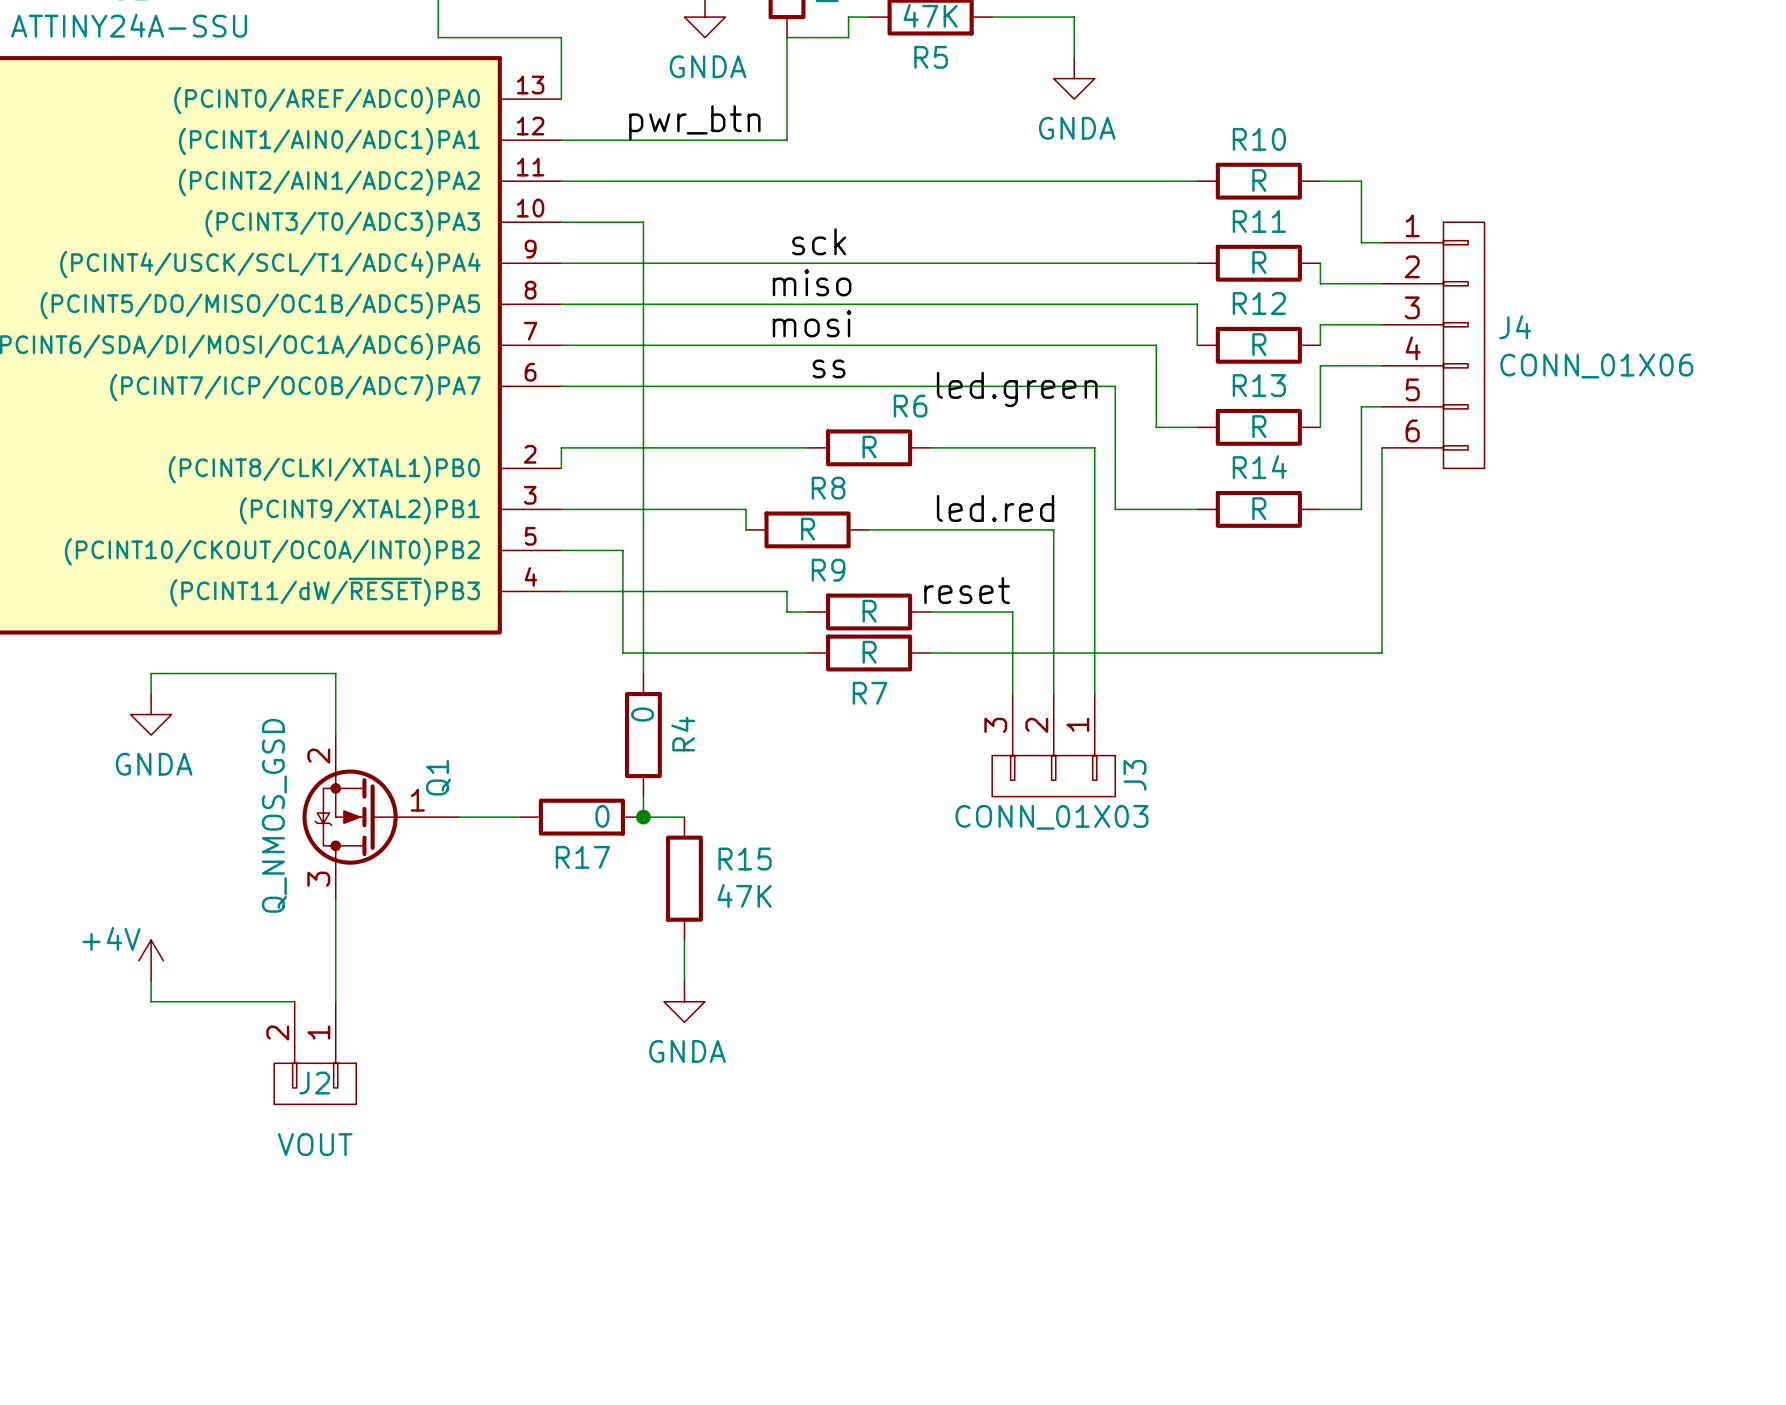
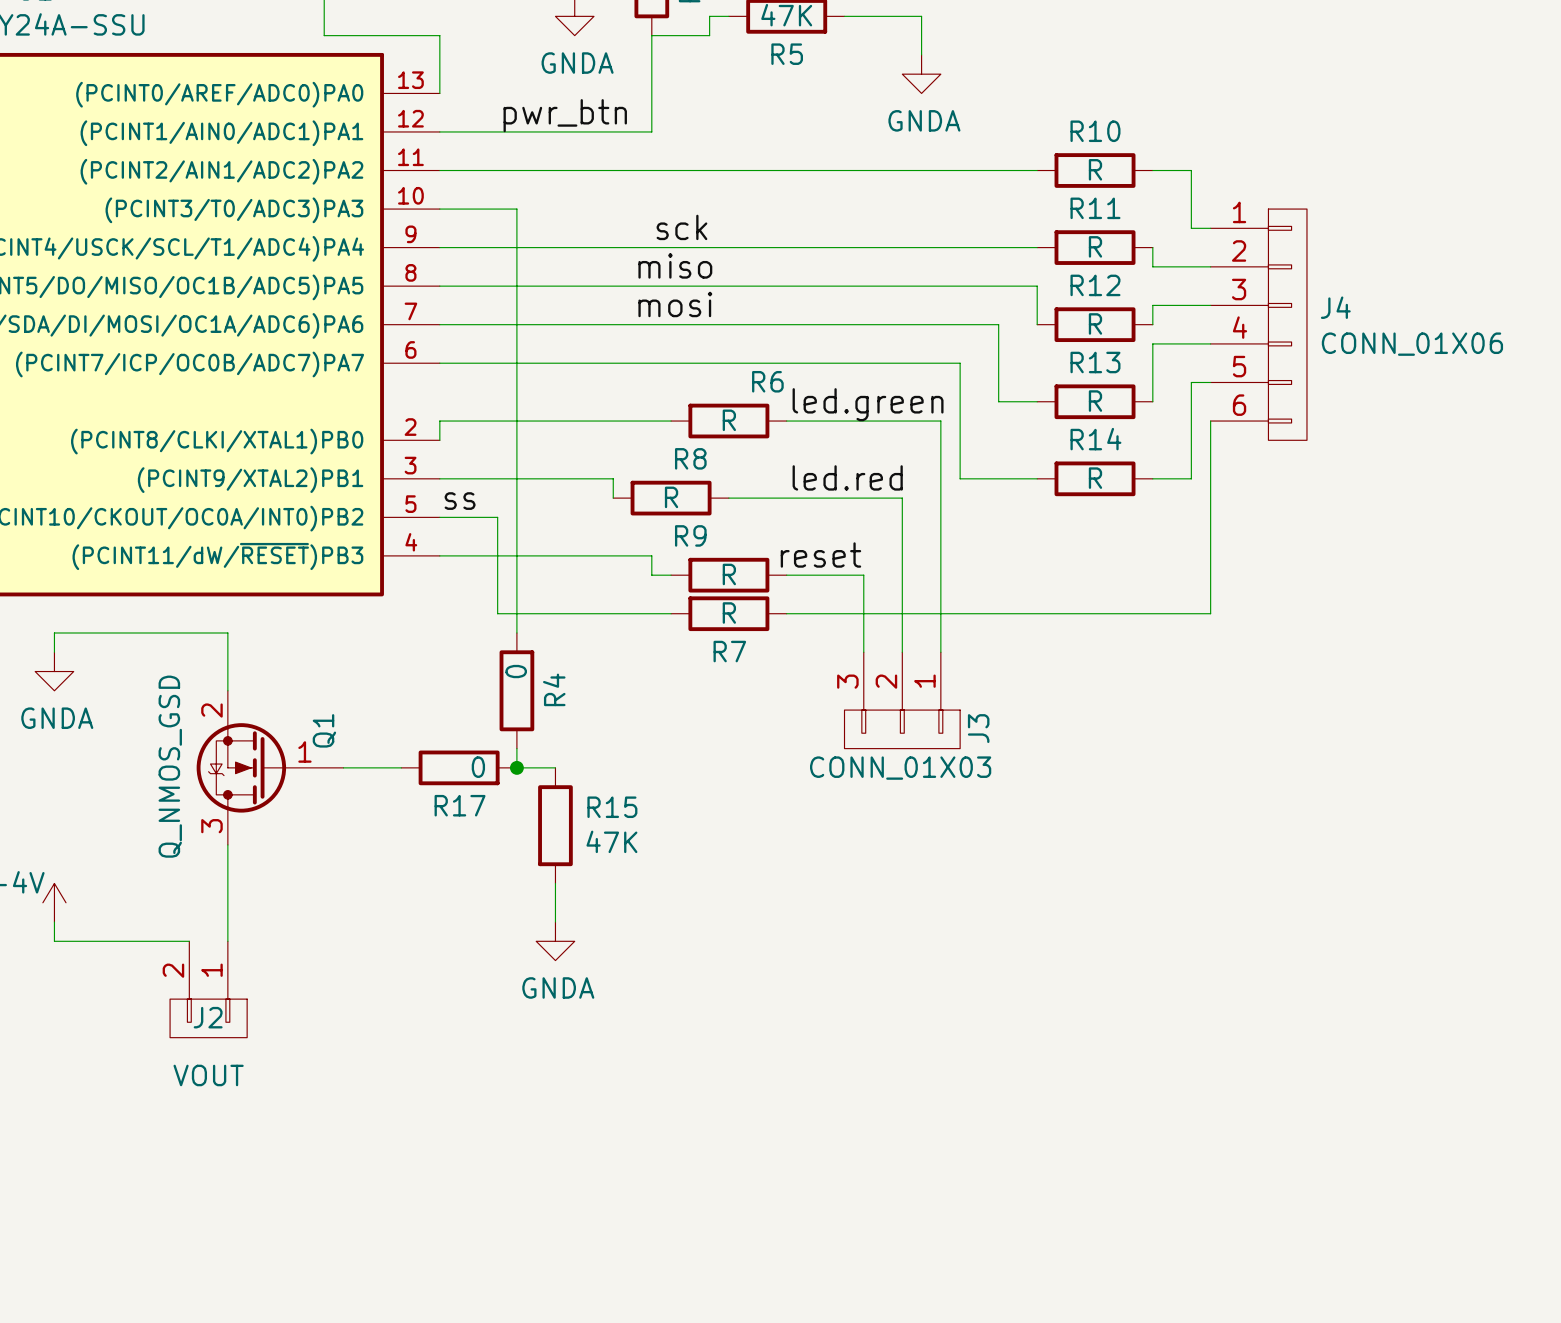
label position: ss (829, 368) -> ss (460, 501)
label position: led.green (1017, 389) -> led.green (868, 404)

